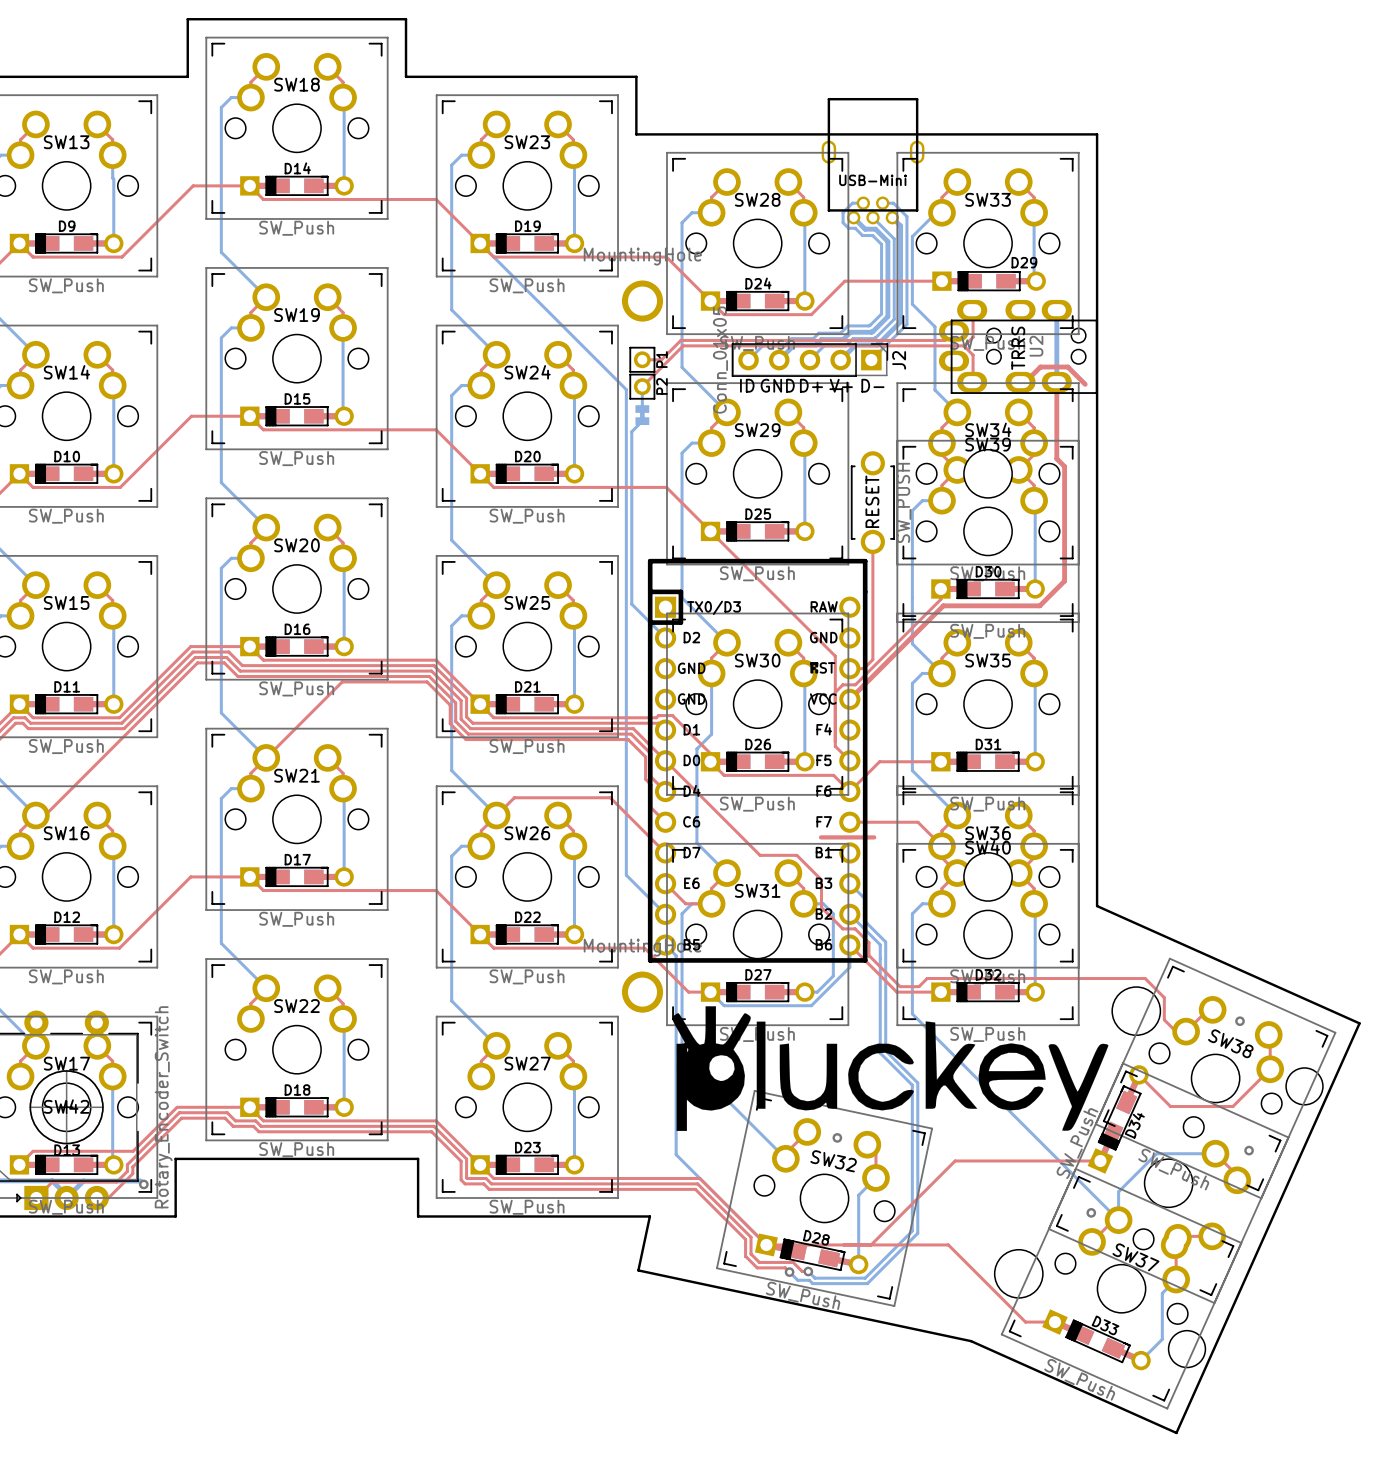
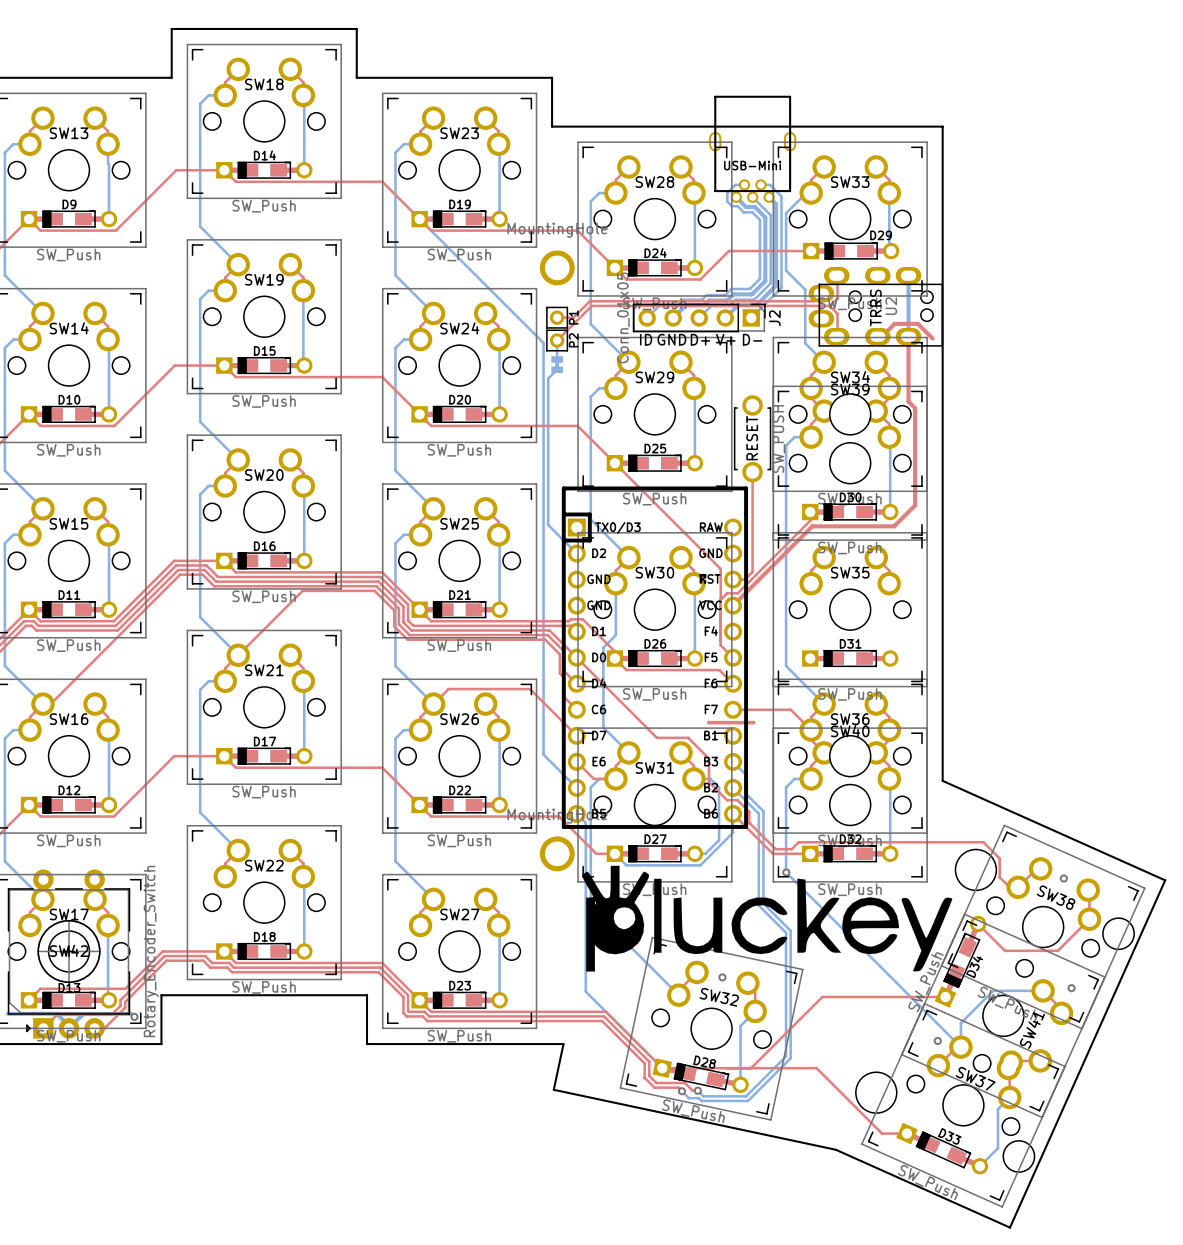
bottom track: (912, 643) (941, 673) (922, 673) (912, 683) -> (786, 558) (786, 592)
bottom track: (1034, 673) (1035, 761) -> none
top track: (938, 759) (940, 761) (879, 761) (849, 791) -> none
via: none -> (786, 872)
SW41 name: none -> SW41 (1032, 1030)

